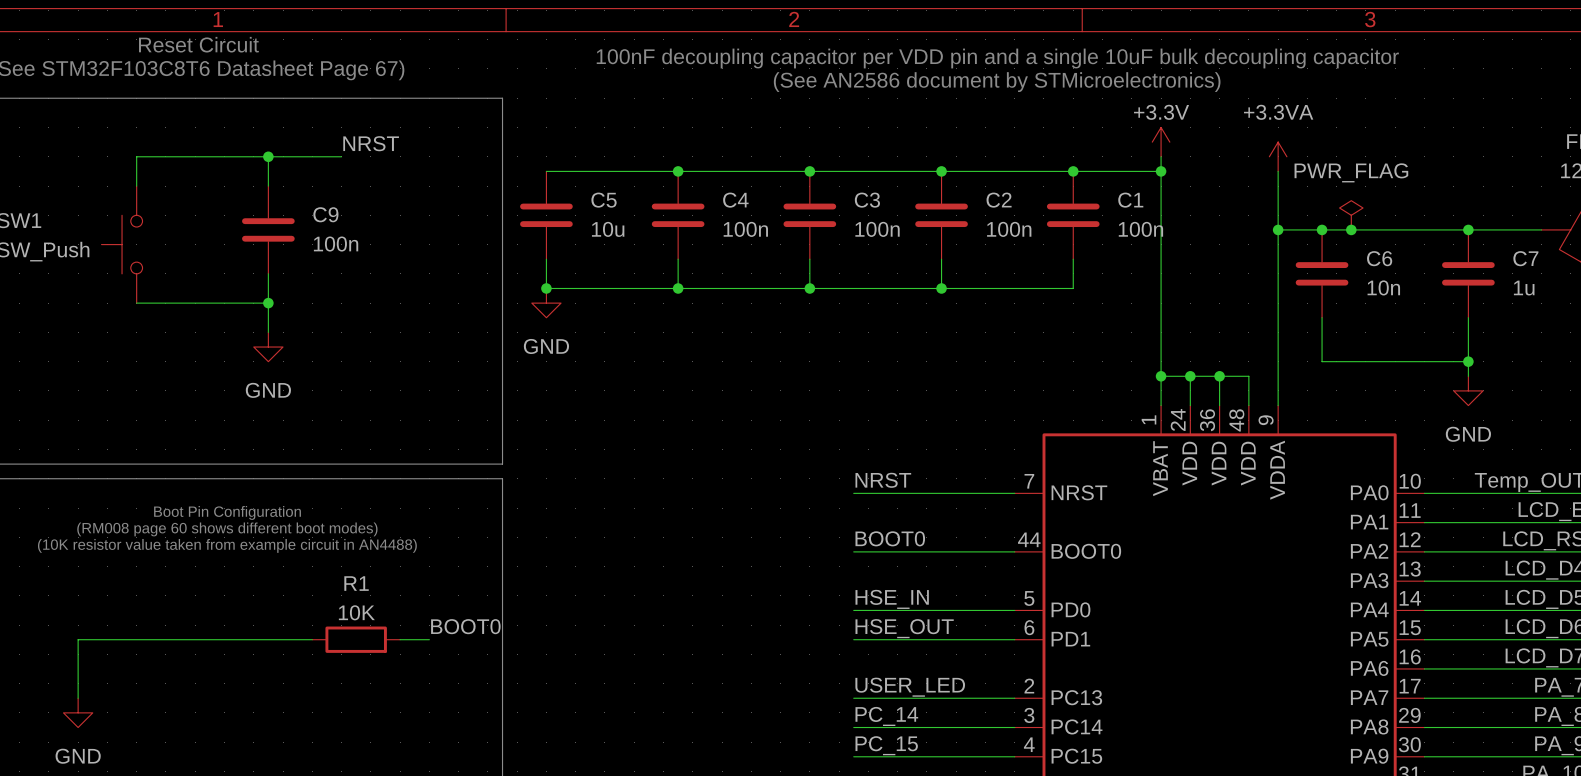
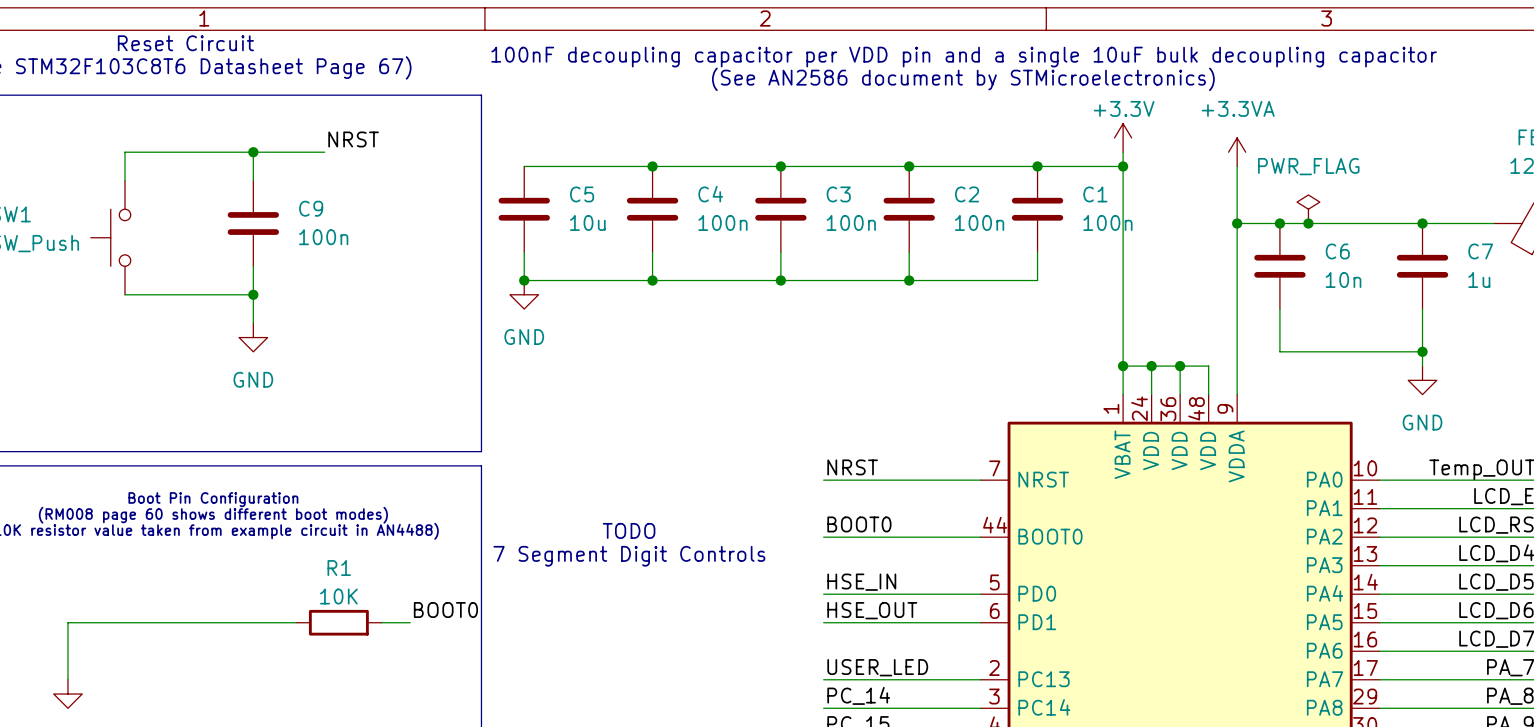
text: none -> TODO (629, 530)
text: none -> 7 Segment Digit Controls (629, 556)

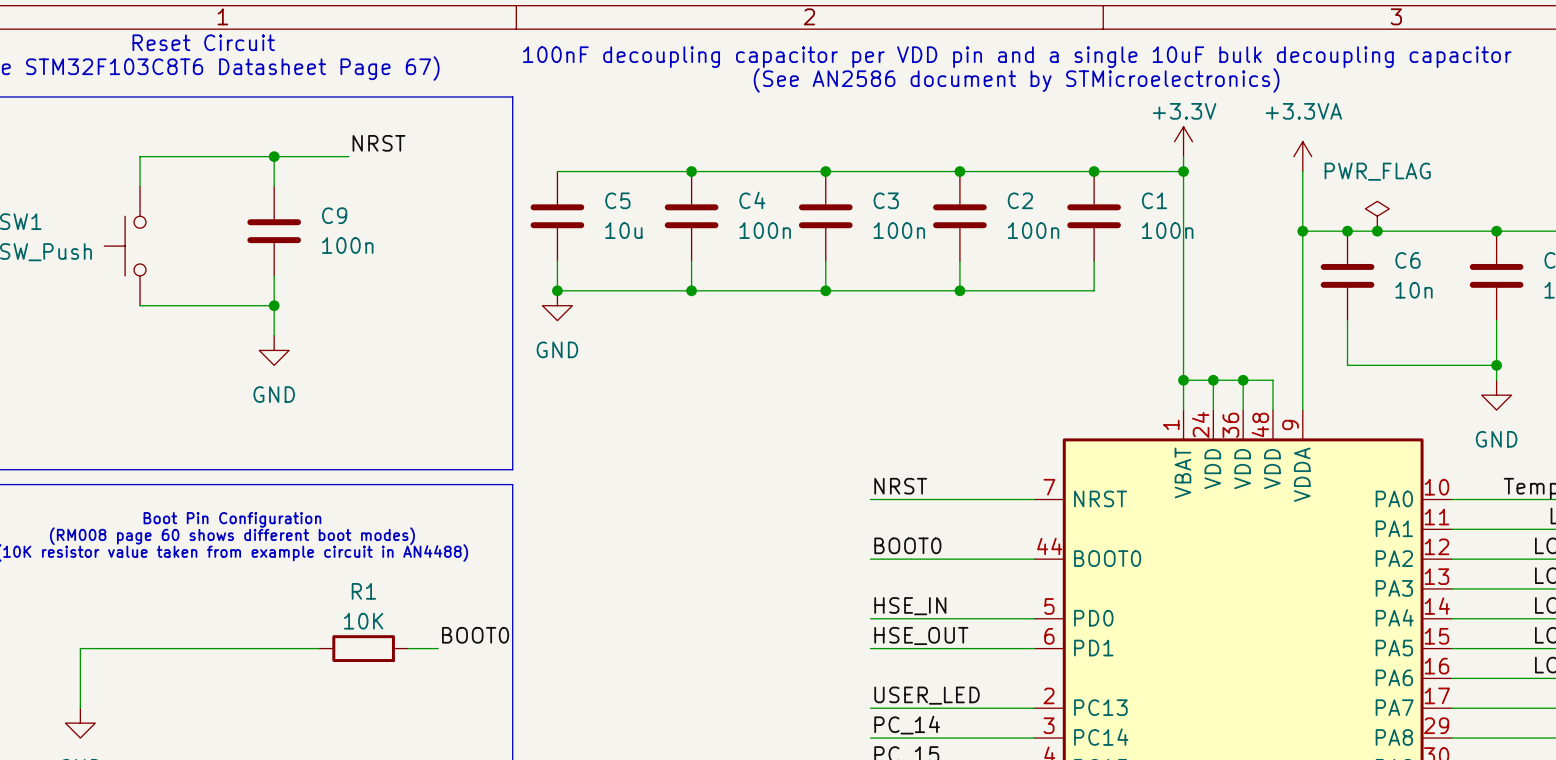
text: TODO (629, 530) -> none
text: 7 Segment Digit Controls (629, 556) -> none

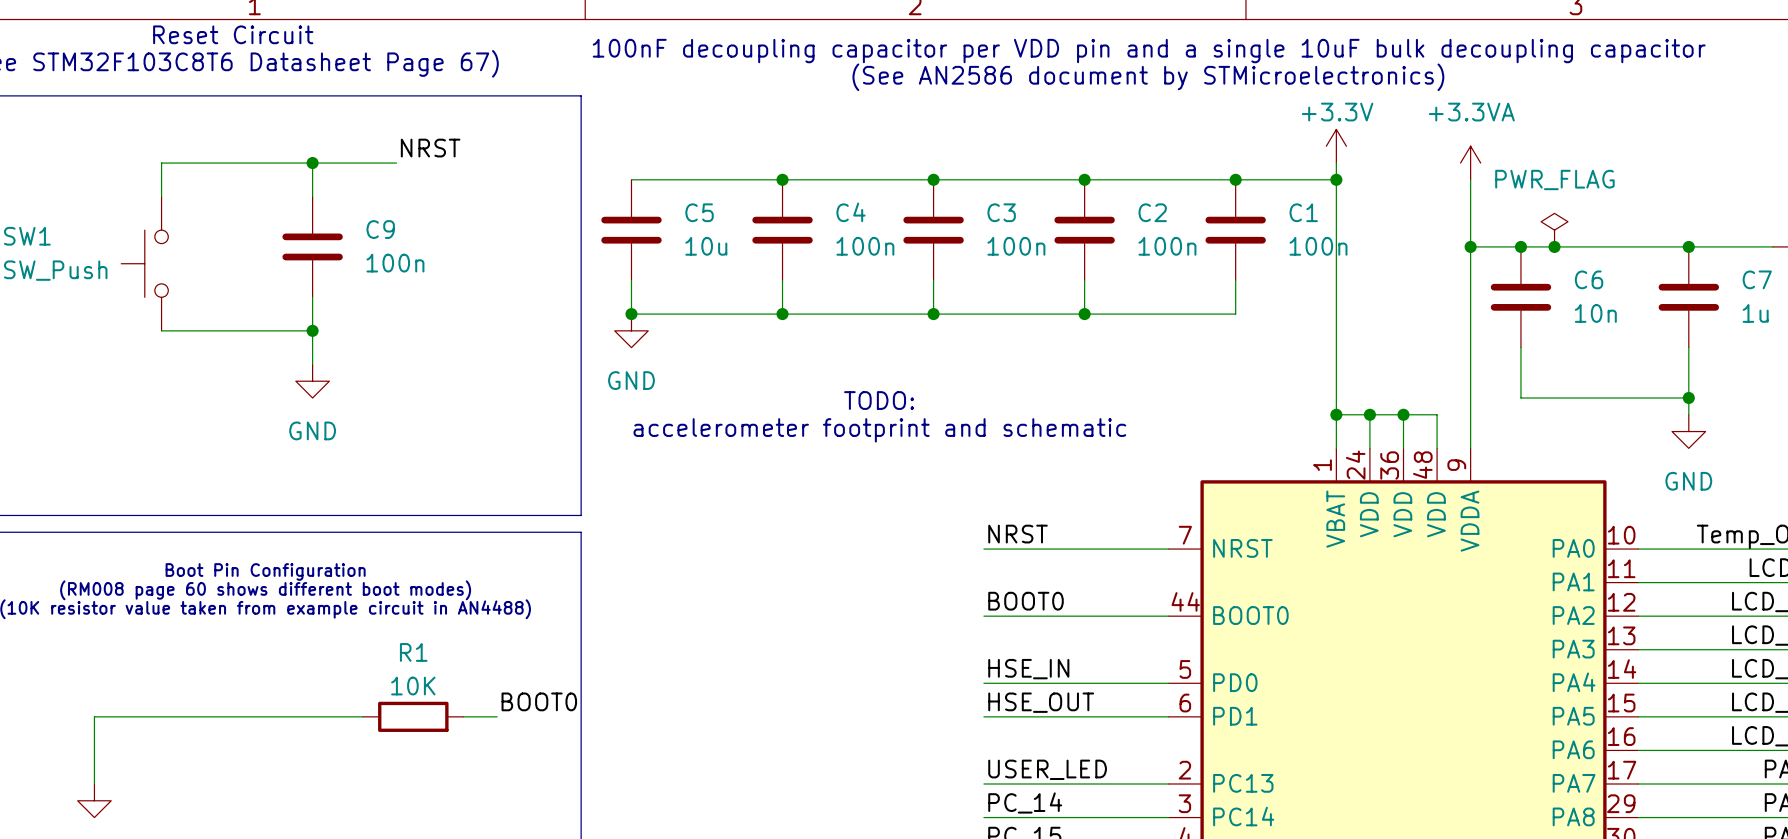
text: none -> TODO: (879, 400)
text: none -> accelerometer footprint and schematic (879, 430)

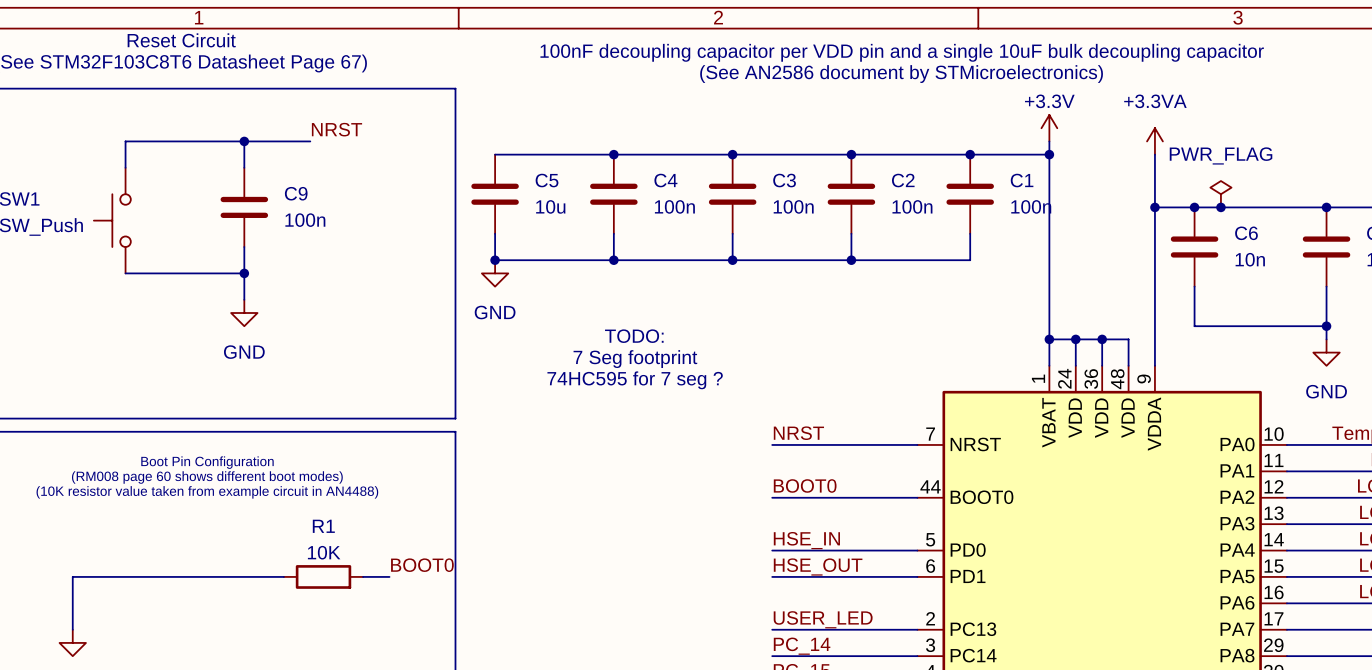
text position: TODO: (879, 400) -> TODO: (634, 336)
text: accelerometer footprint and schematic (879, 430) -> none
text: none -> 7 Seg footprint (635, 359)
text: none -> 74HC595 for 7 seg ? (635, 380)

